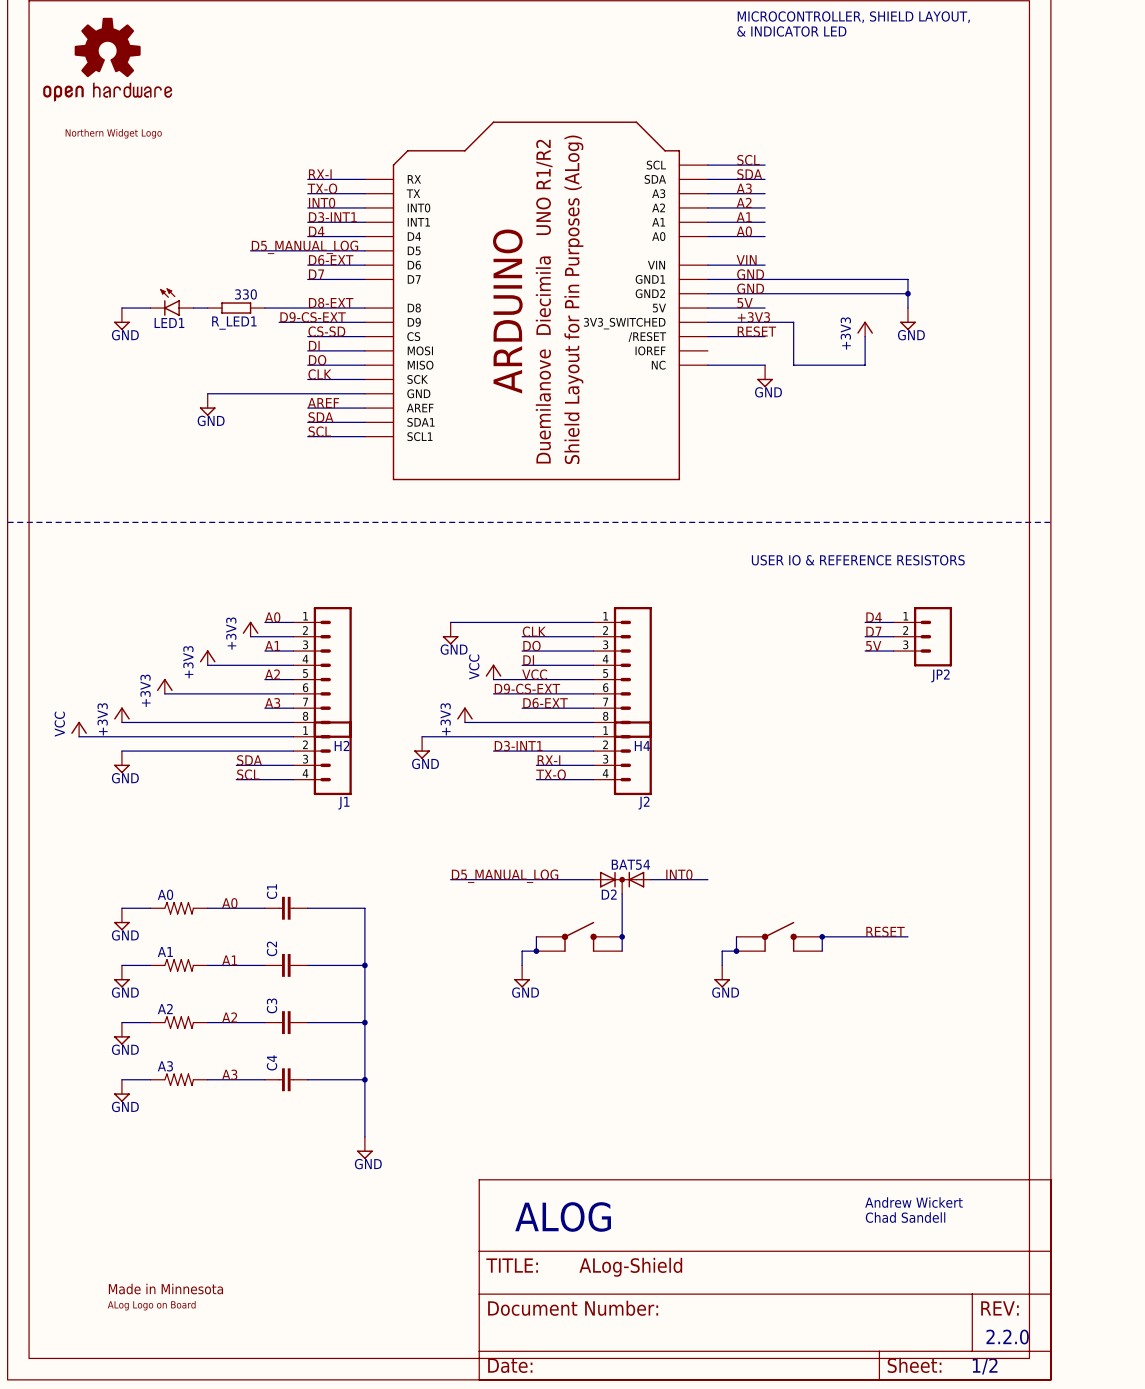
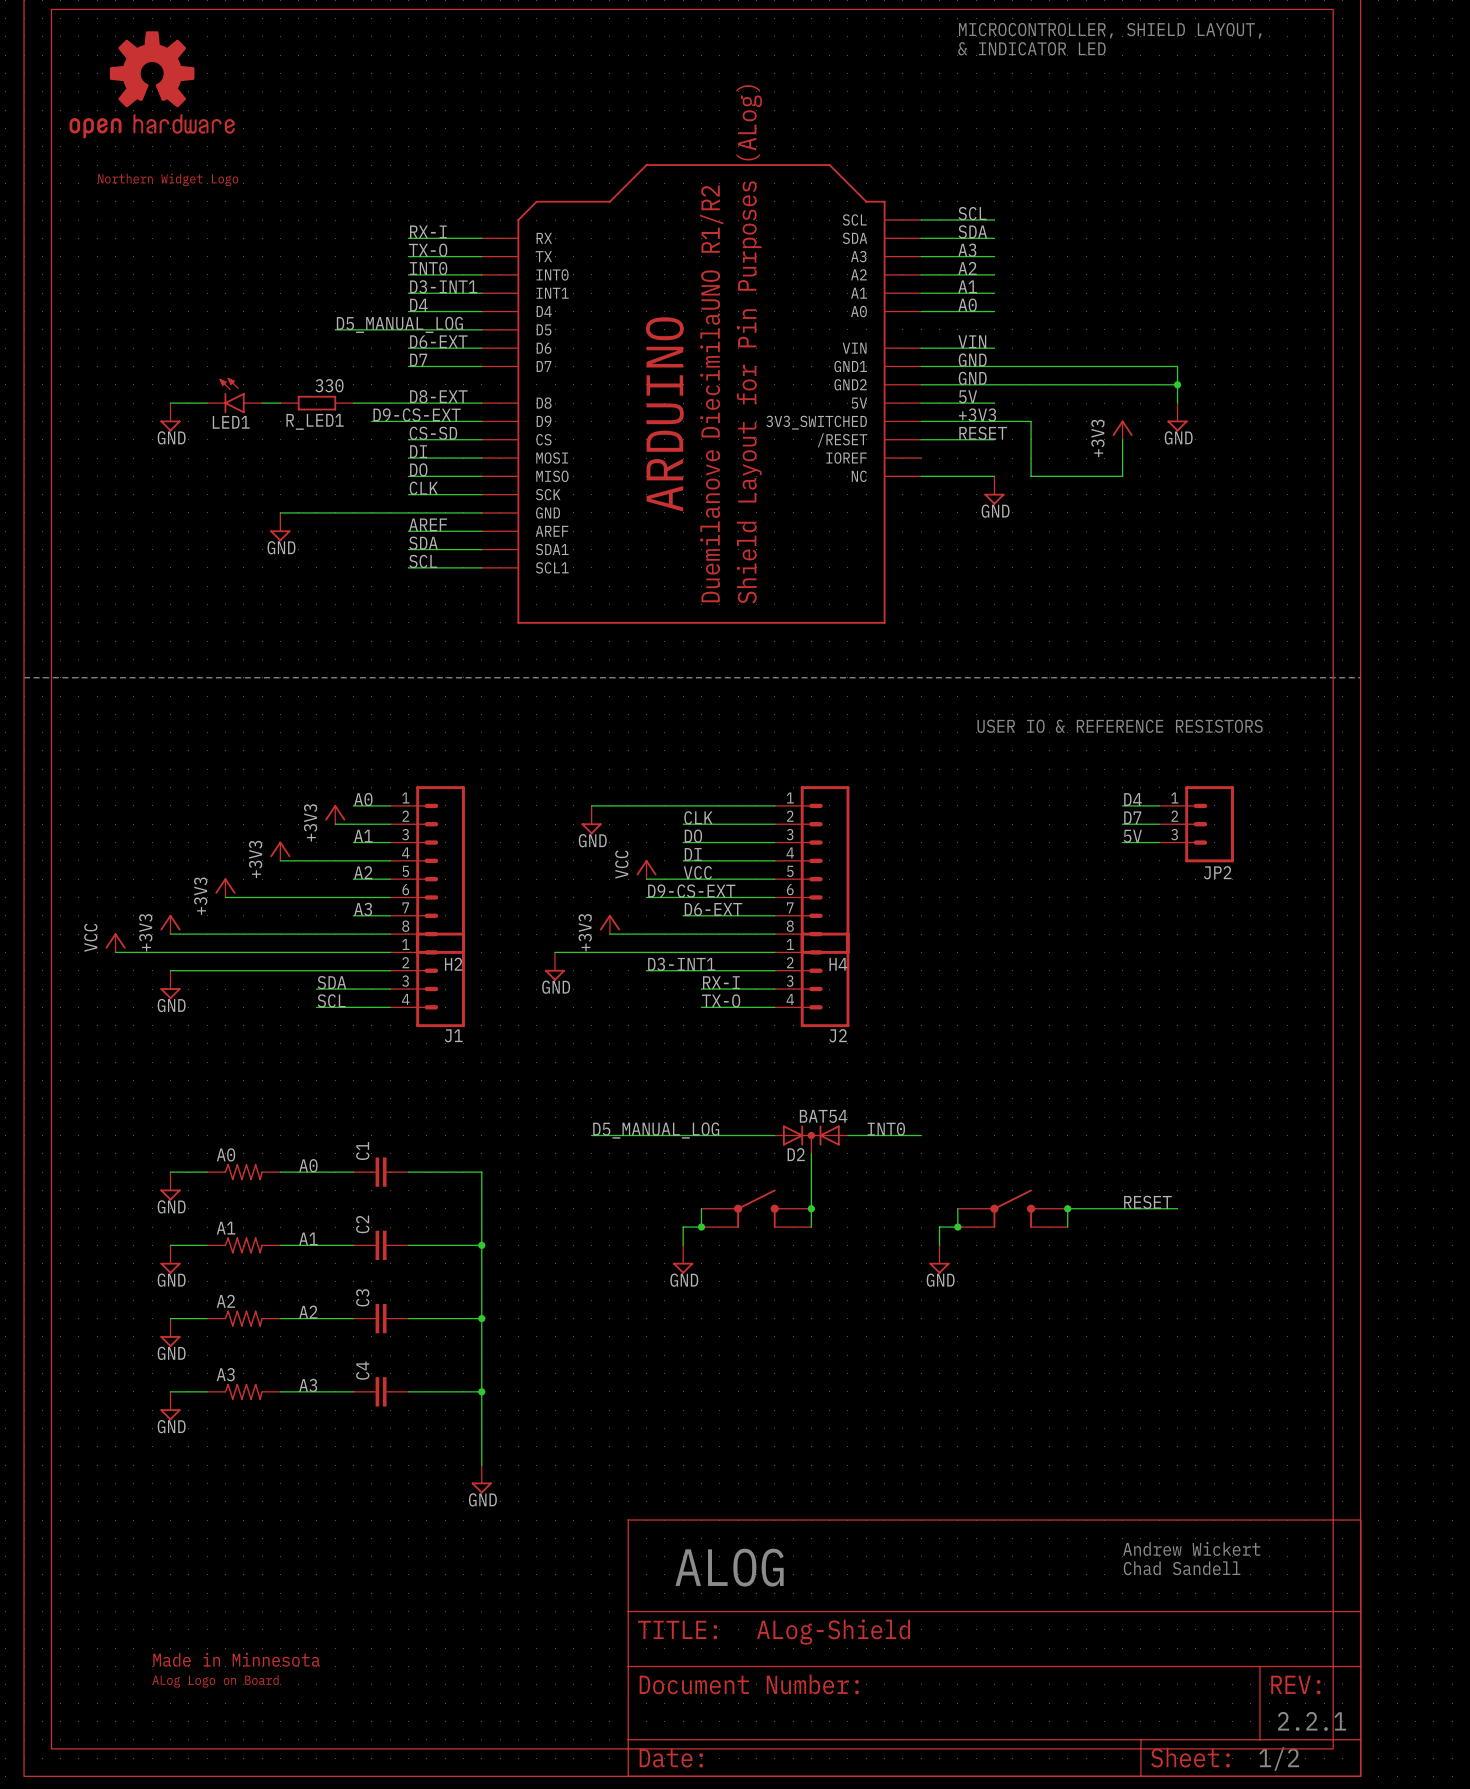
text: 2.2.0 (1007, 1337) -> 2.2.1 (1312, 1721)

